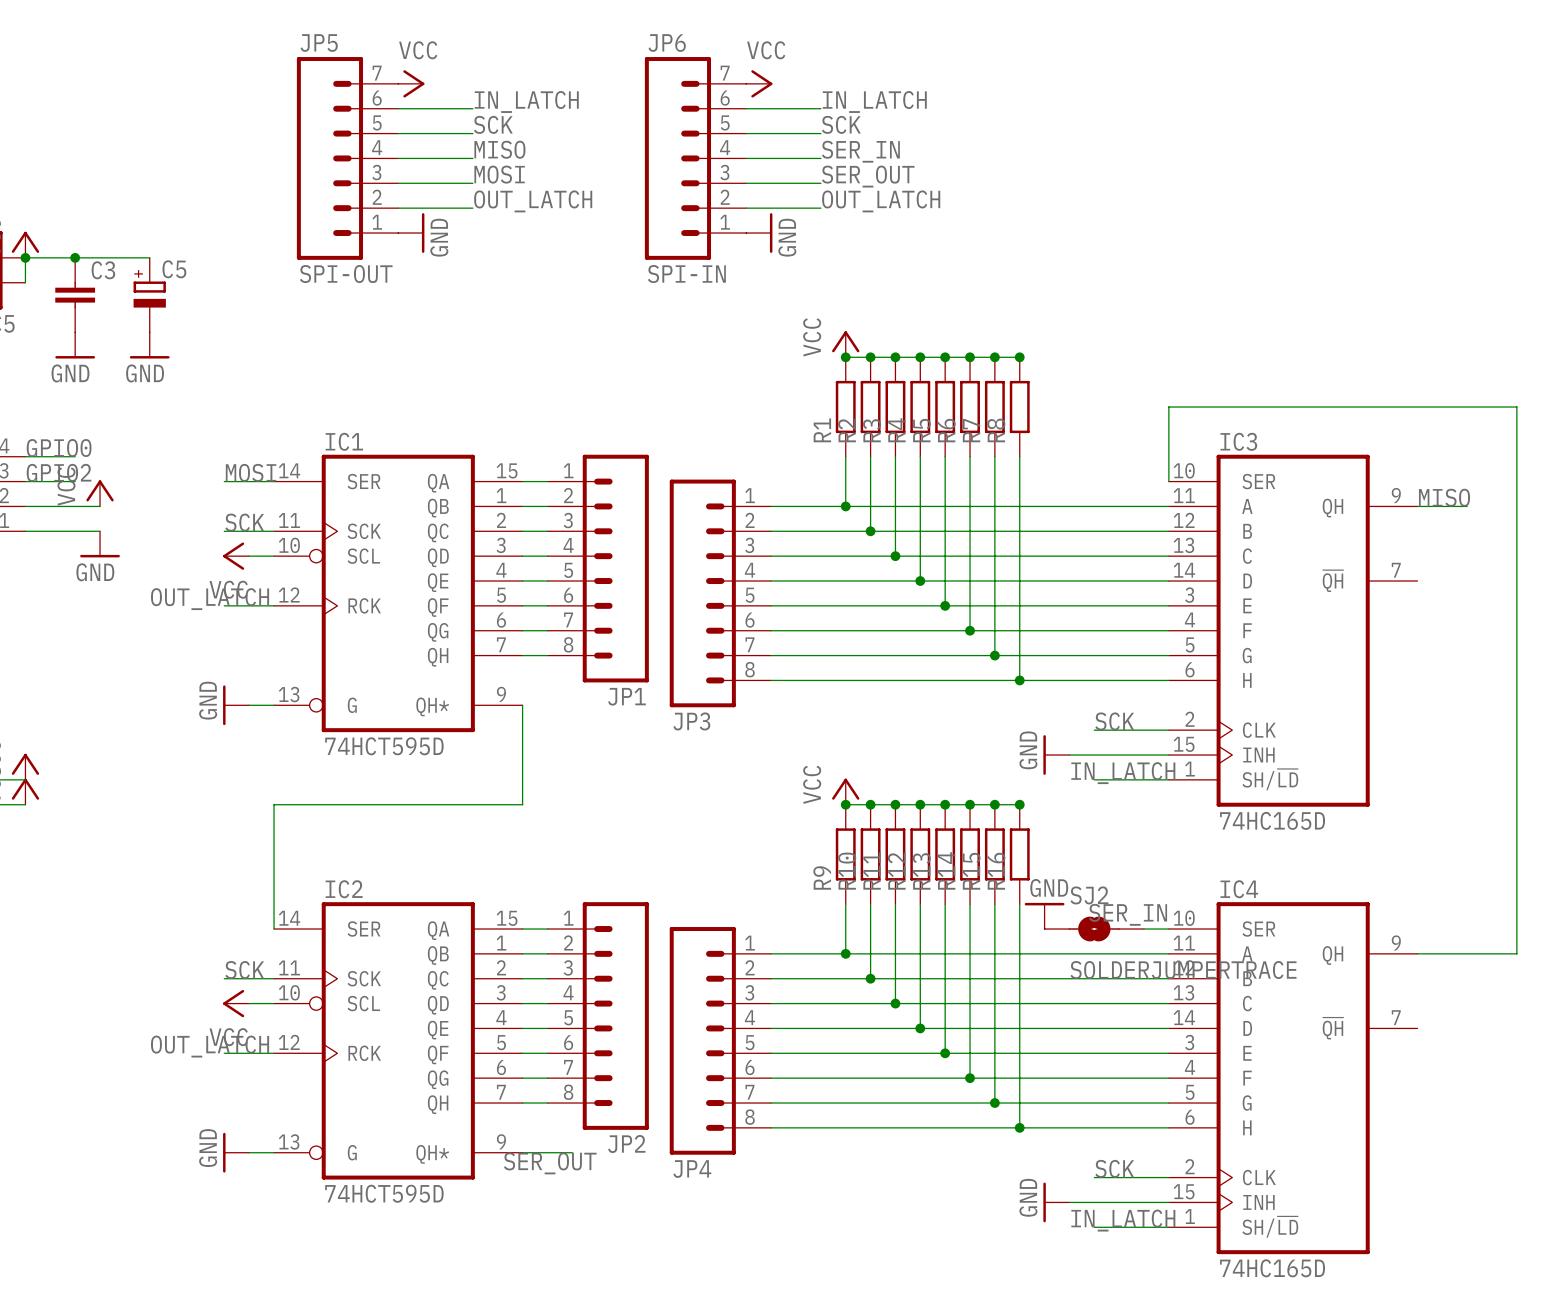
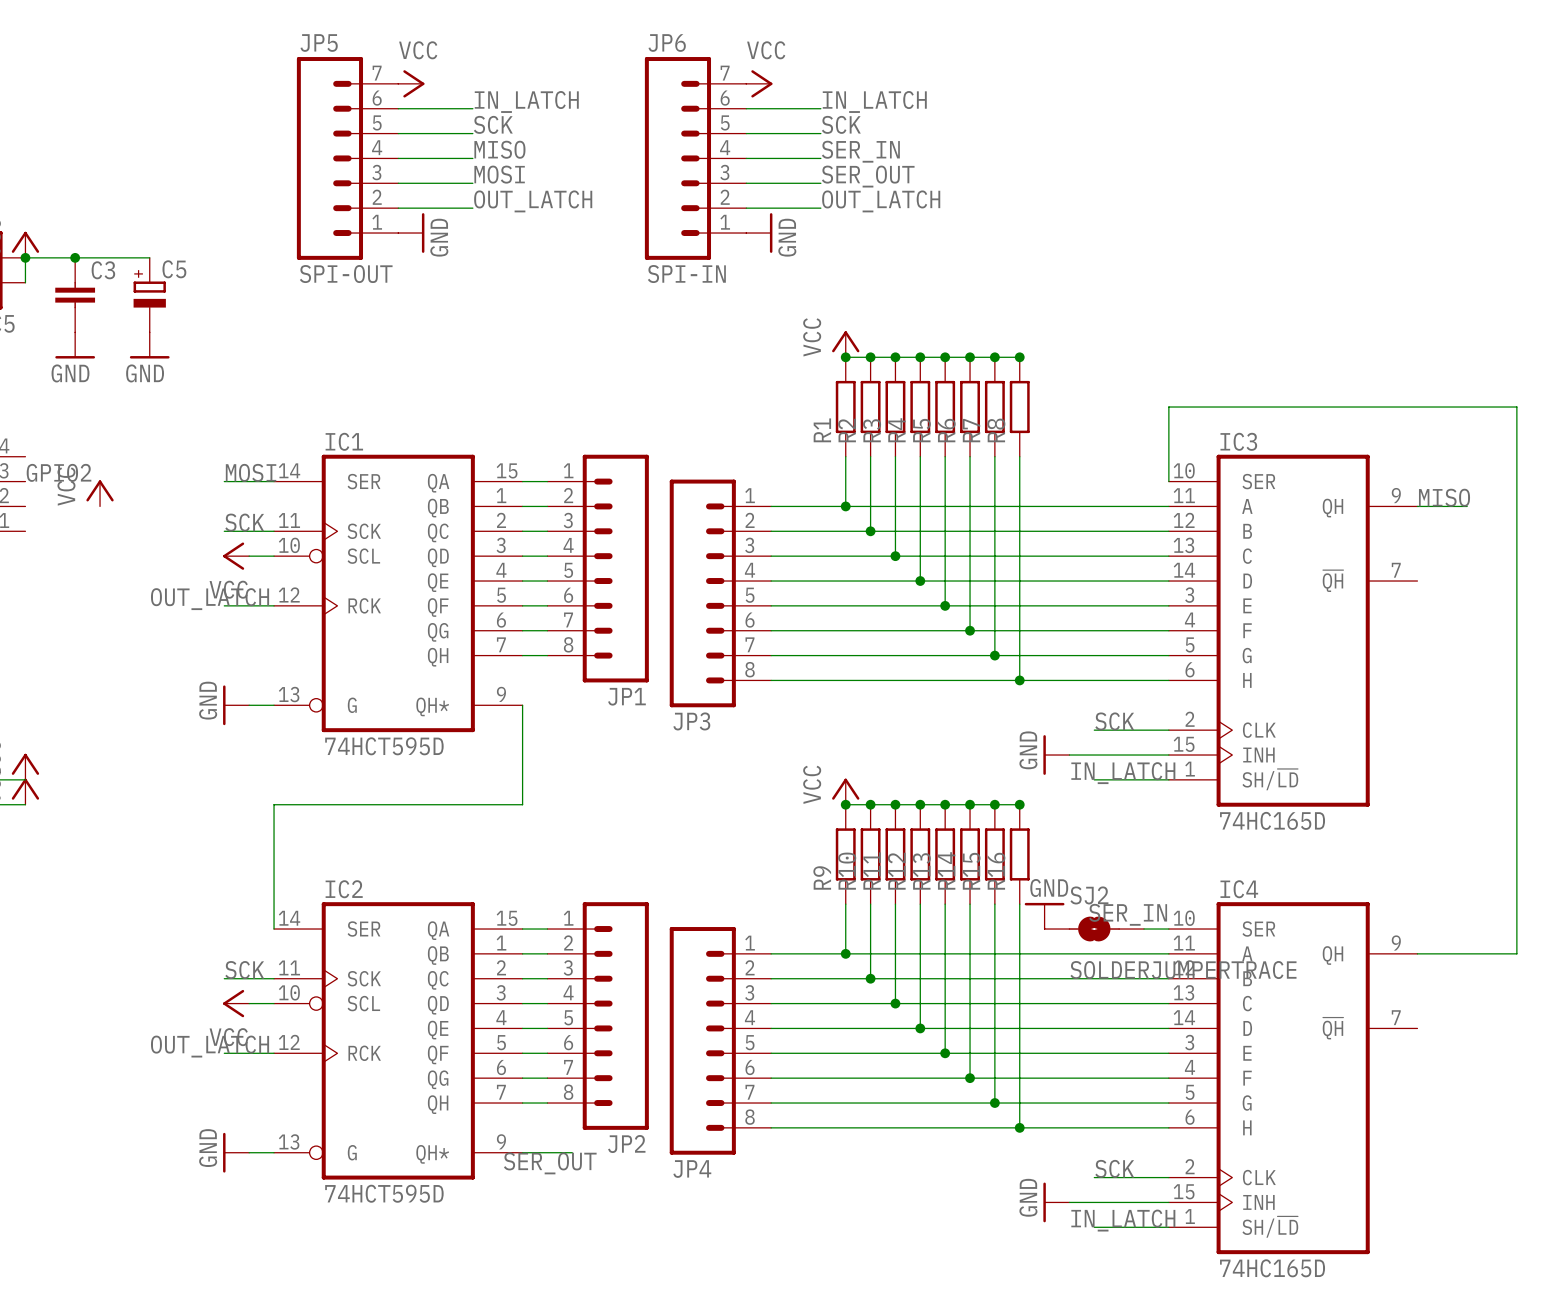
label: GPIO0 (59, 448) -> none
wire: (25, 456) (75, 456) -> none
wire: (25, 481) (75, 481) -> none
wire: (25, 506) (100, 506) -> none
wire: (25, 531) (100, 531) -> none
power symbol: GND (100, 544) -> none

